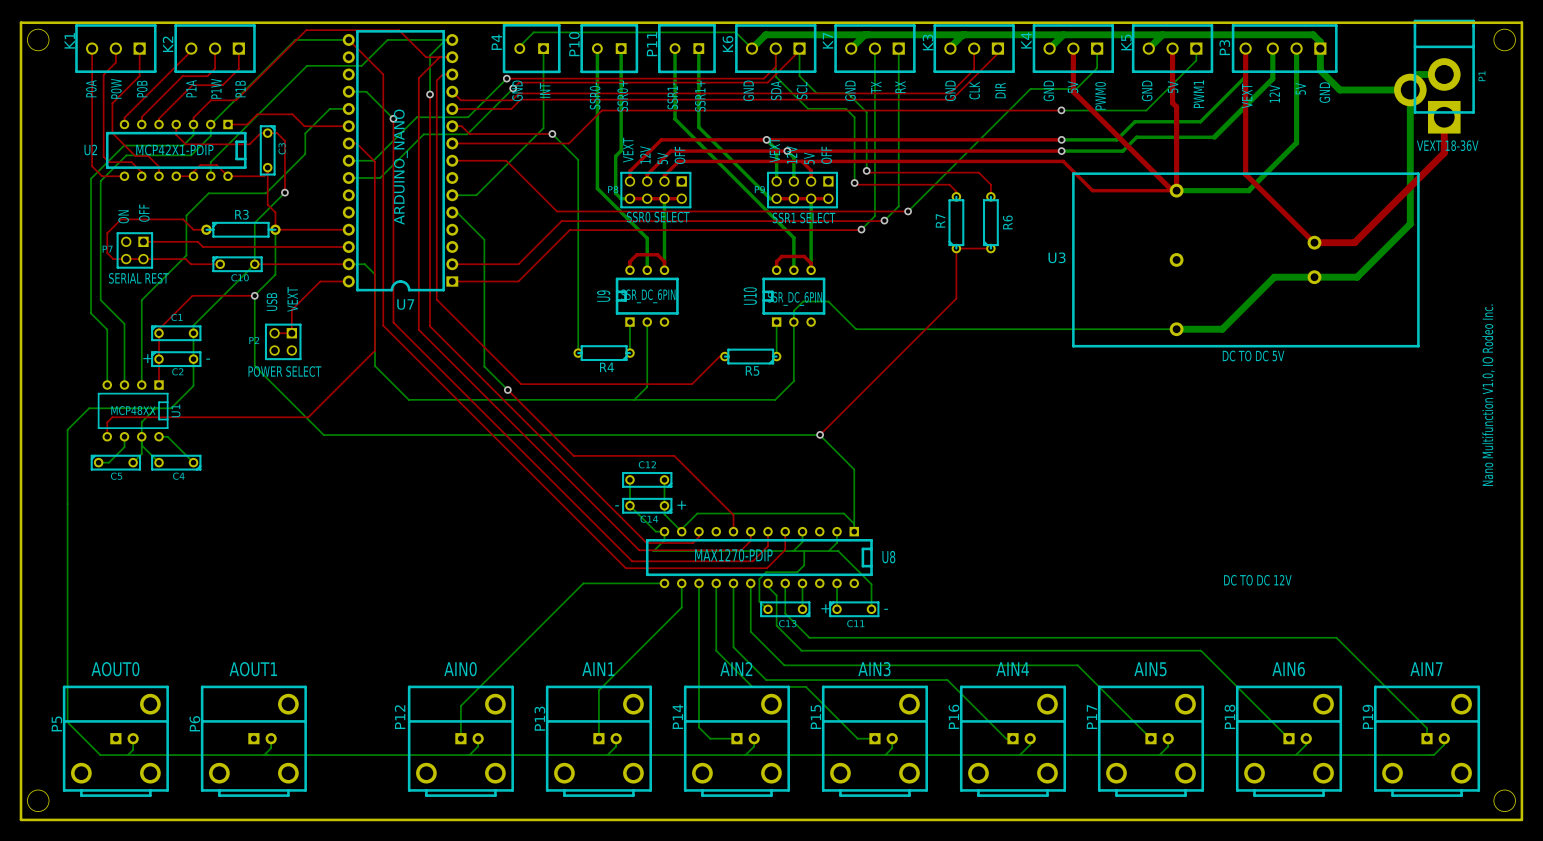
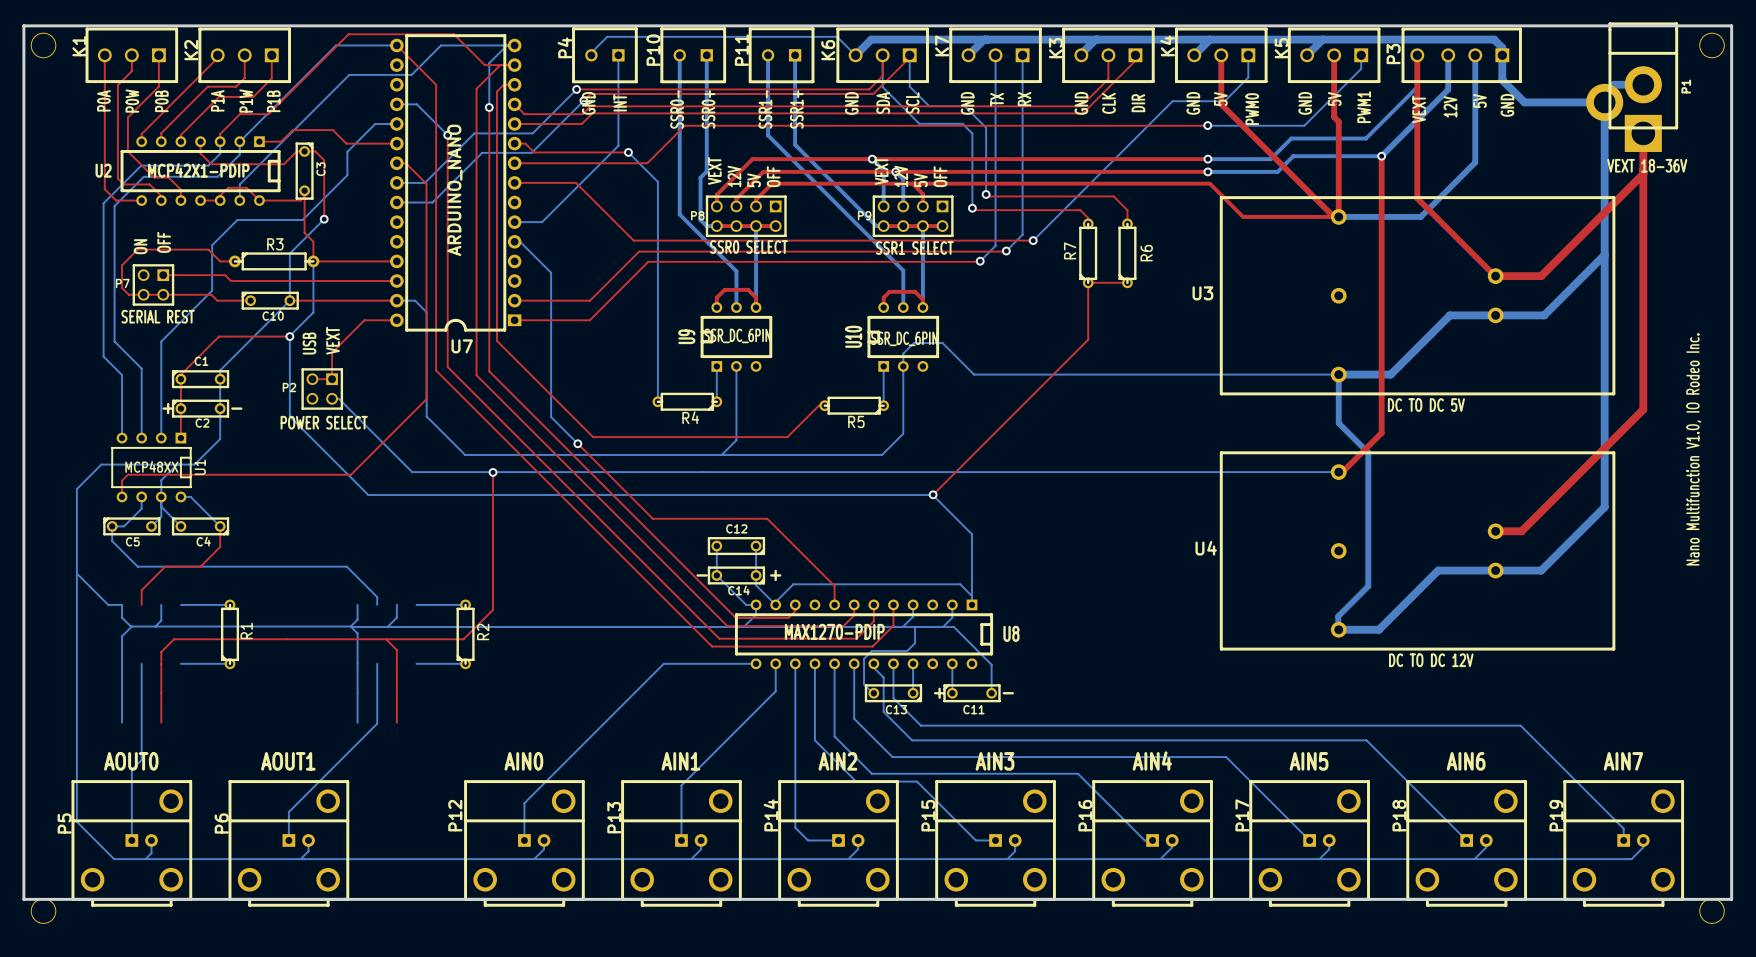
top track: none -> (1381, 156) (1381, 432) (1342, 472) (1338, 472)
via: none -> (1381, 156)
top track: none -> (1643, 174) (1643, 409) (1521, 531) (1495, 531)
bottom track: none -> (1604, 254) (1604, 507) (1541, 570) (1438, 570) (1378, 629) (1338, 629) (1338, 616) (1368, 586) (1368, 452) (1338, 423) (1338, 374)
bottom track: none -> (332, 398) (338, 398) (412, 472) (1338, 472)
top track: none -> (493, 472) (493, 609) (463, 639) (174, 639) (161, 652) (161, 722)
via: none -> (493, 472)
bottom track: none -> (112, 526) (112, 541) (137, 566) (346, 566) (377, 597) (377, 604)
top track: none -> (220, 526) (220, 547) (200, 566) (165, 566) (141, 590) (141, 604)
U4: none -> (1417, 550)
bottom track: none -> (76, 573) (108, 604) (122, 604) (122, 617) (130, 626) (350, 626)
bottom track: none -> (161, 604) (161, 620) (155, 626)
bottom track: none -> (180, 604) (230, 604)
bottom track: none -> (357, 604) (357, 619) (350, 626)
bottom track: none -> (396, 604) (396, 617) (387, 627)
bottom track: none -> (416, 604) (465, 604)
bottom track: none -> (131, 626) (122, 636) (122, 722)
bottom track: none -> (350, 626) (357, 633) (357, 722)
bottom track: none -> (351, 627) (743, 627)
R1: none -> (230, 634)
R2: none -> (465, 634)
top track: none -> (386, 639) (396, 650) (396, 722)
bottom track: none -> (141, 663) (141, 759) (131, 769) (131, 840)
bottom track: none -> (180, 663) (230, 663)
bottom track: none -> (377, 663) (377, 723) (288, 812) (288, 840)
bottom track: none -> (416, 663) (465, 663)
board edge: (20, 790) (20, 819) -> (23, 899) (1731, 899)
board edge: (1521, 790) (1521, 819) -> none
board edge: (20, 819) (1521, 819) -> none

